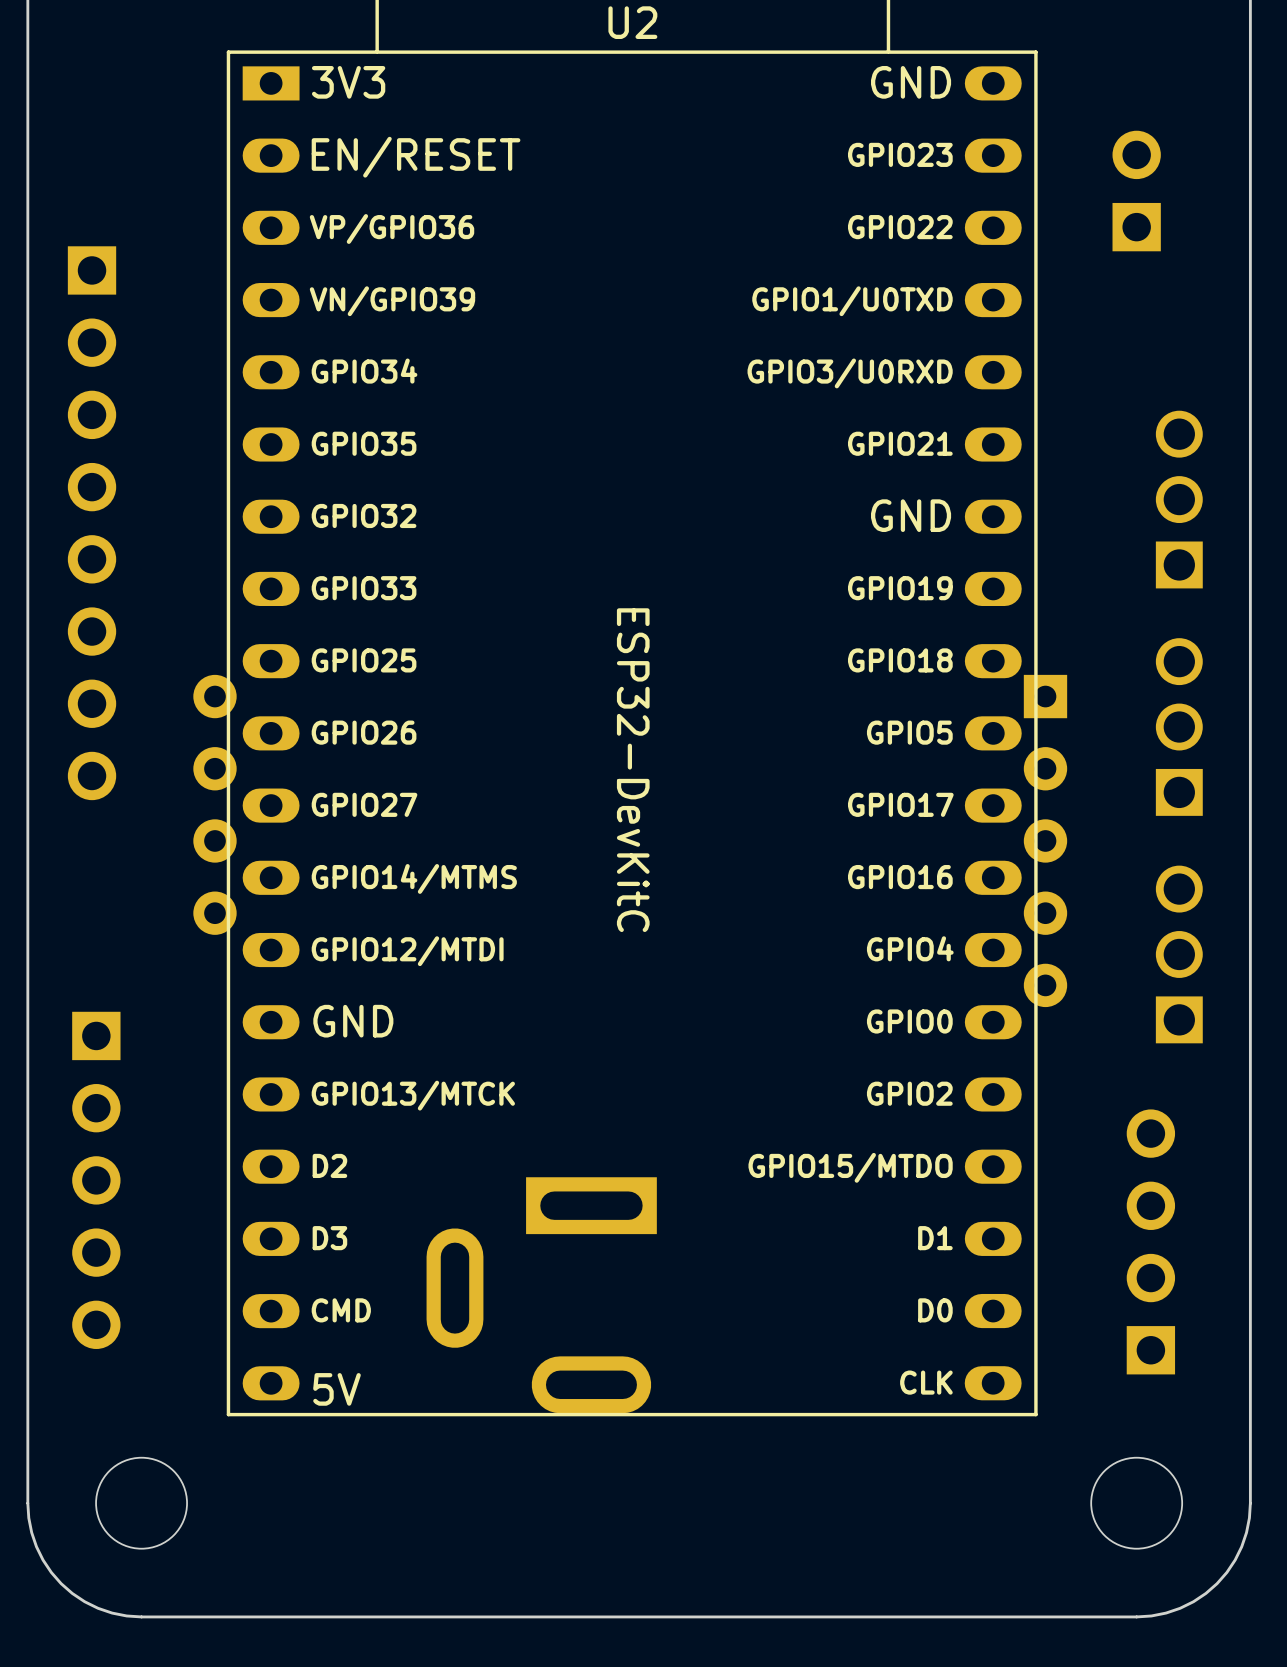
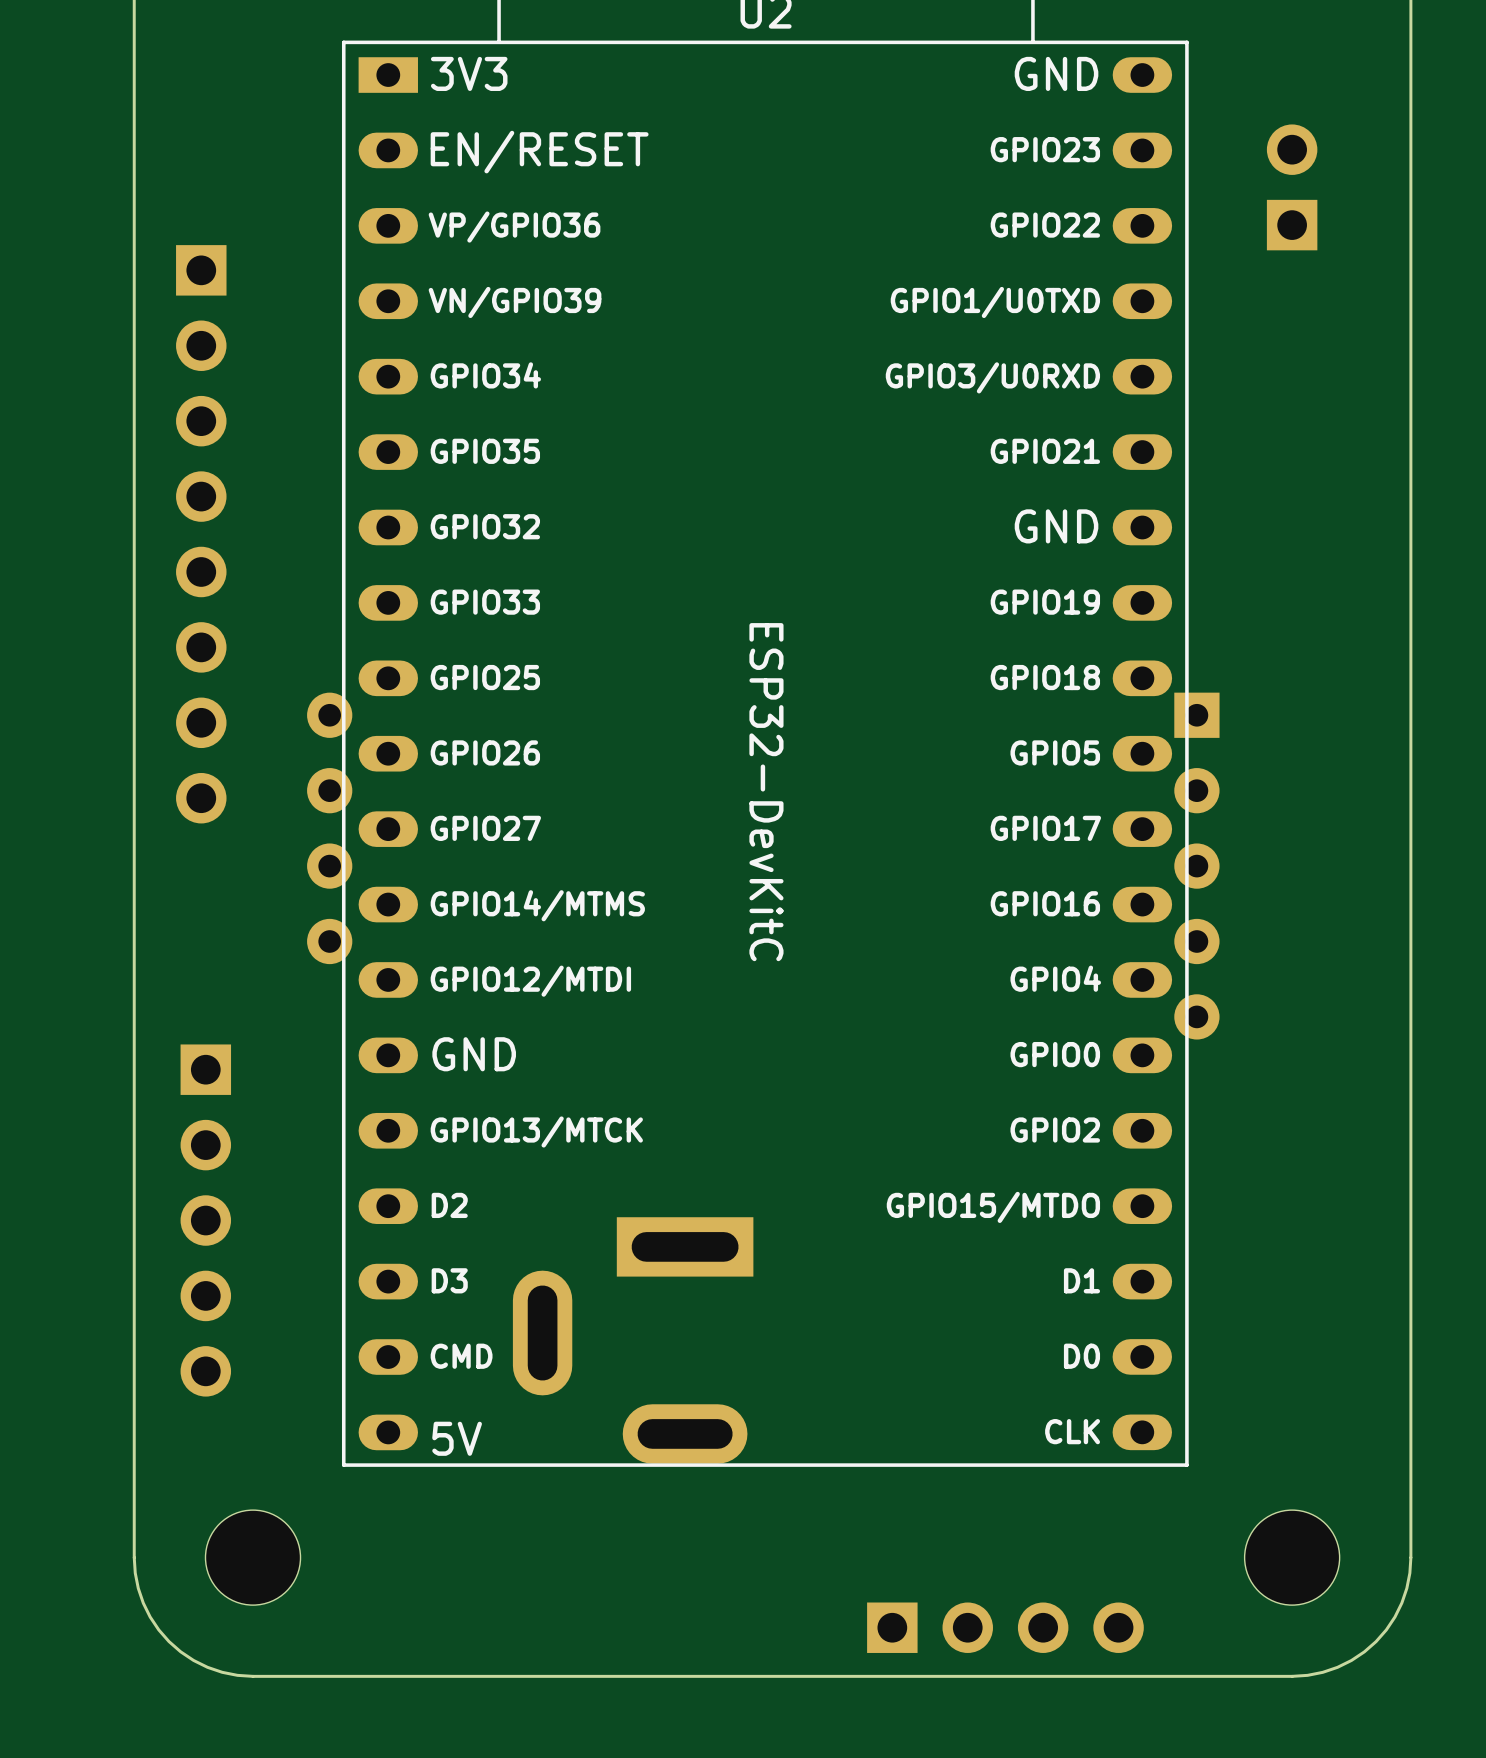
part: (1179, 499) -> none
part: (1179, 727) -> none
part: (1179, 954) -> none
part rotation: 0° (1150, 1241) -> 90° clockwise (1005, 1627)
part position: (1150, 1241) -> (1005, 1627)
part position: (541, 1295) -> (633, 1340)

